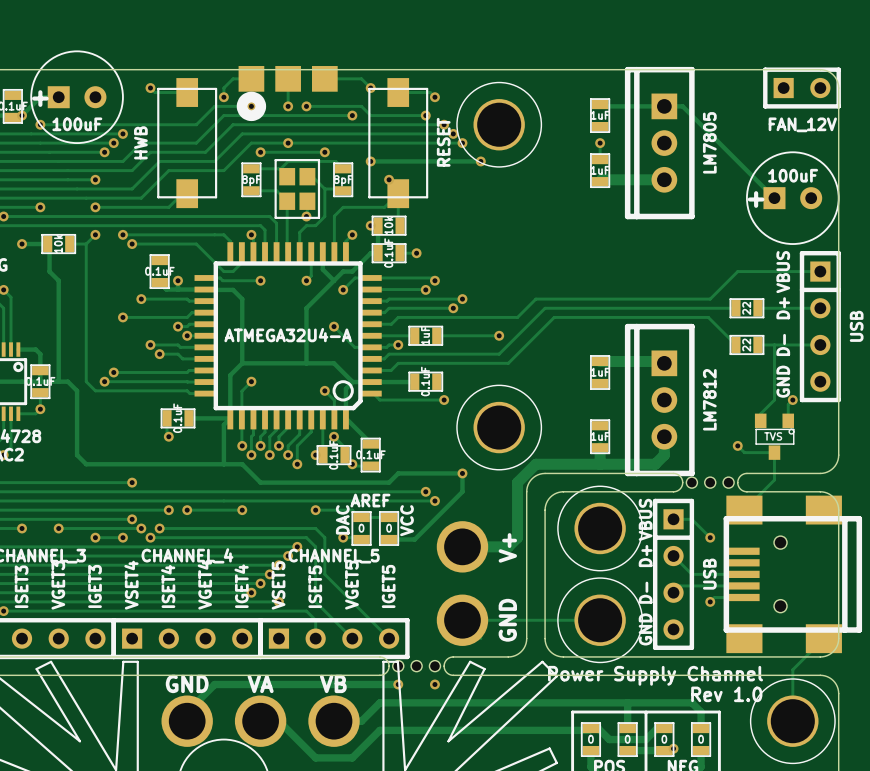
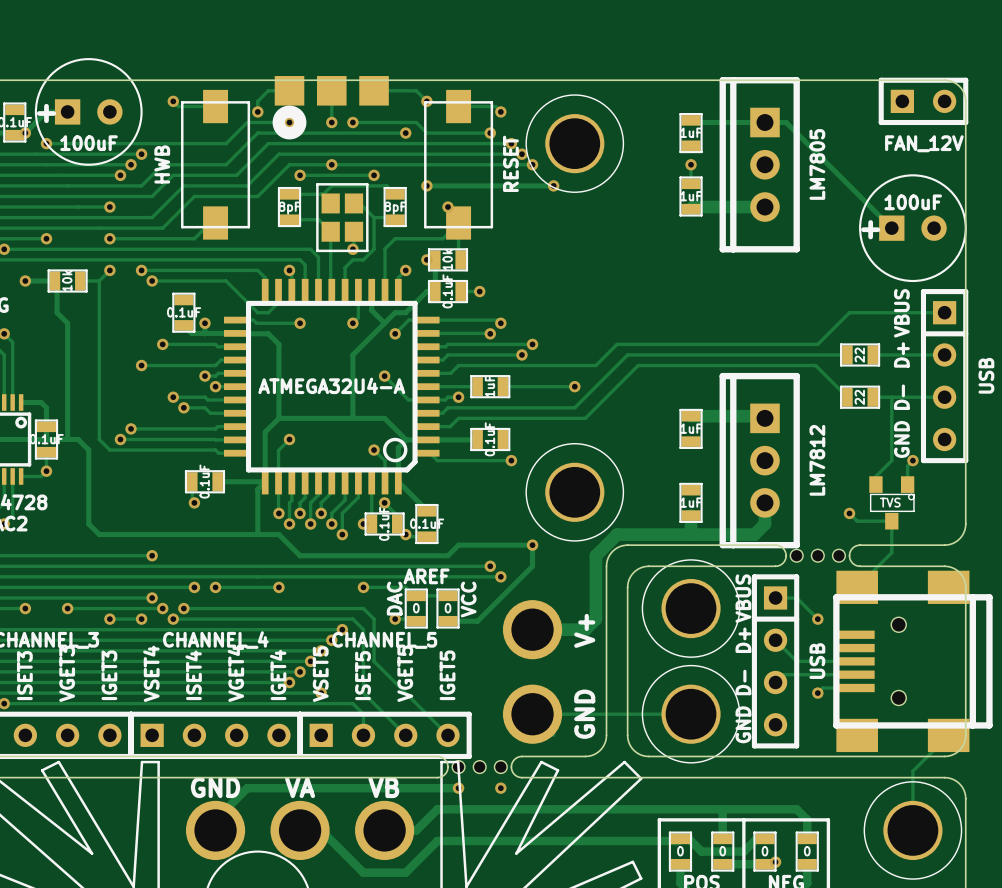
text: Power Supply Channel (655, 675) -> none
text: Rev 1.0 (726, 694) -> none

